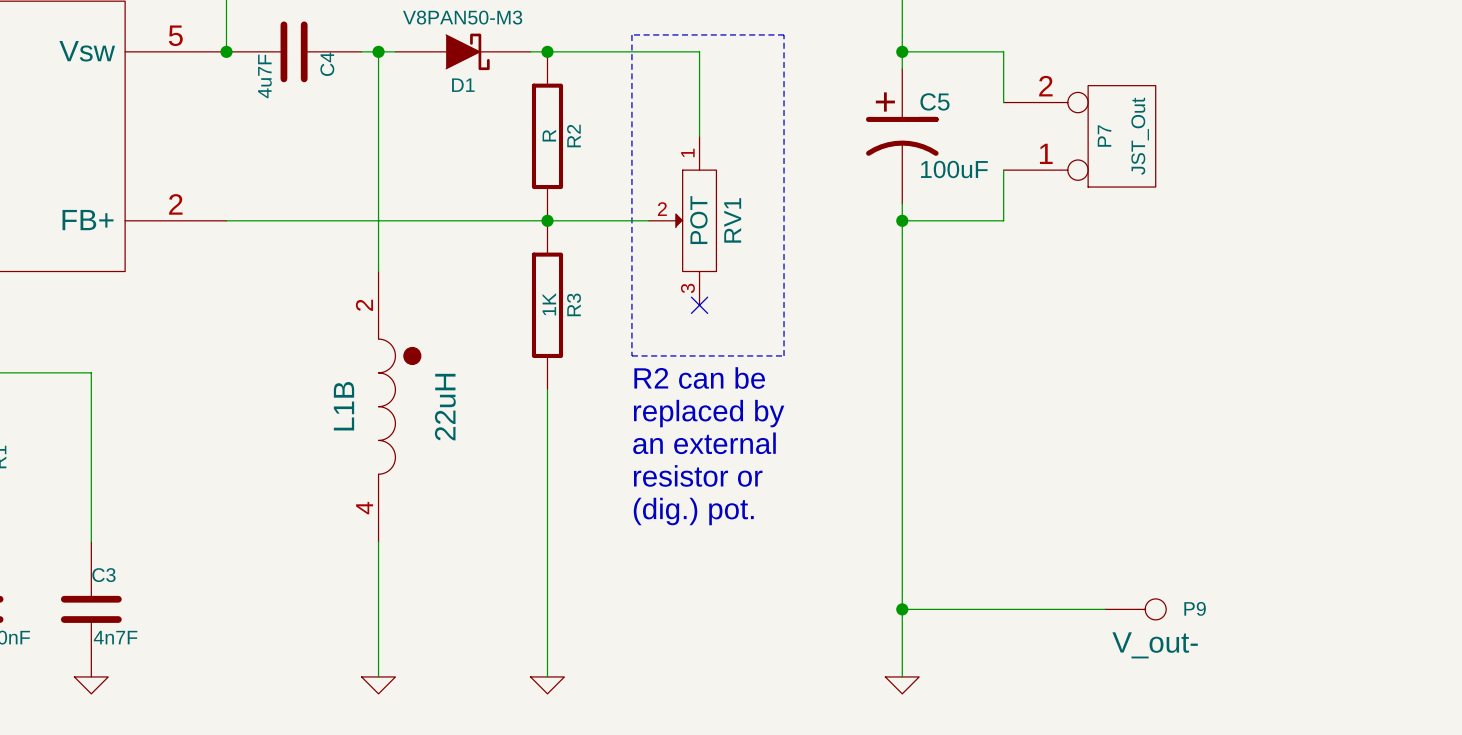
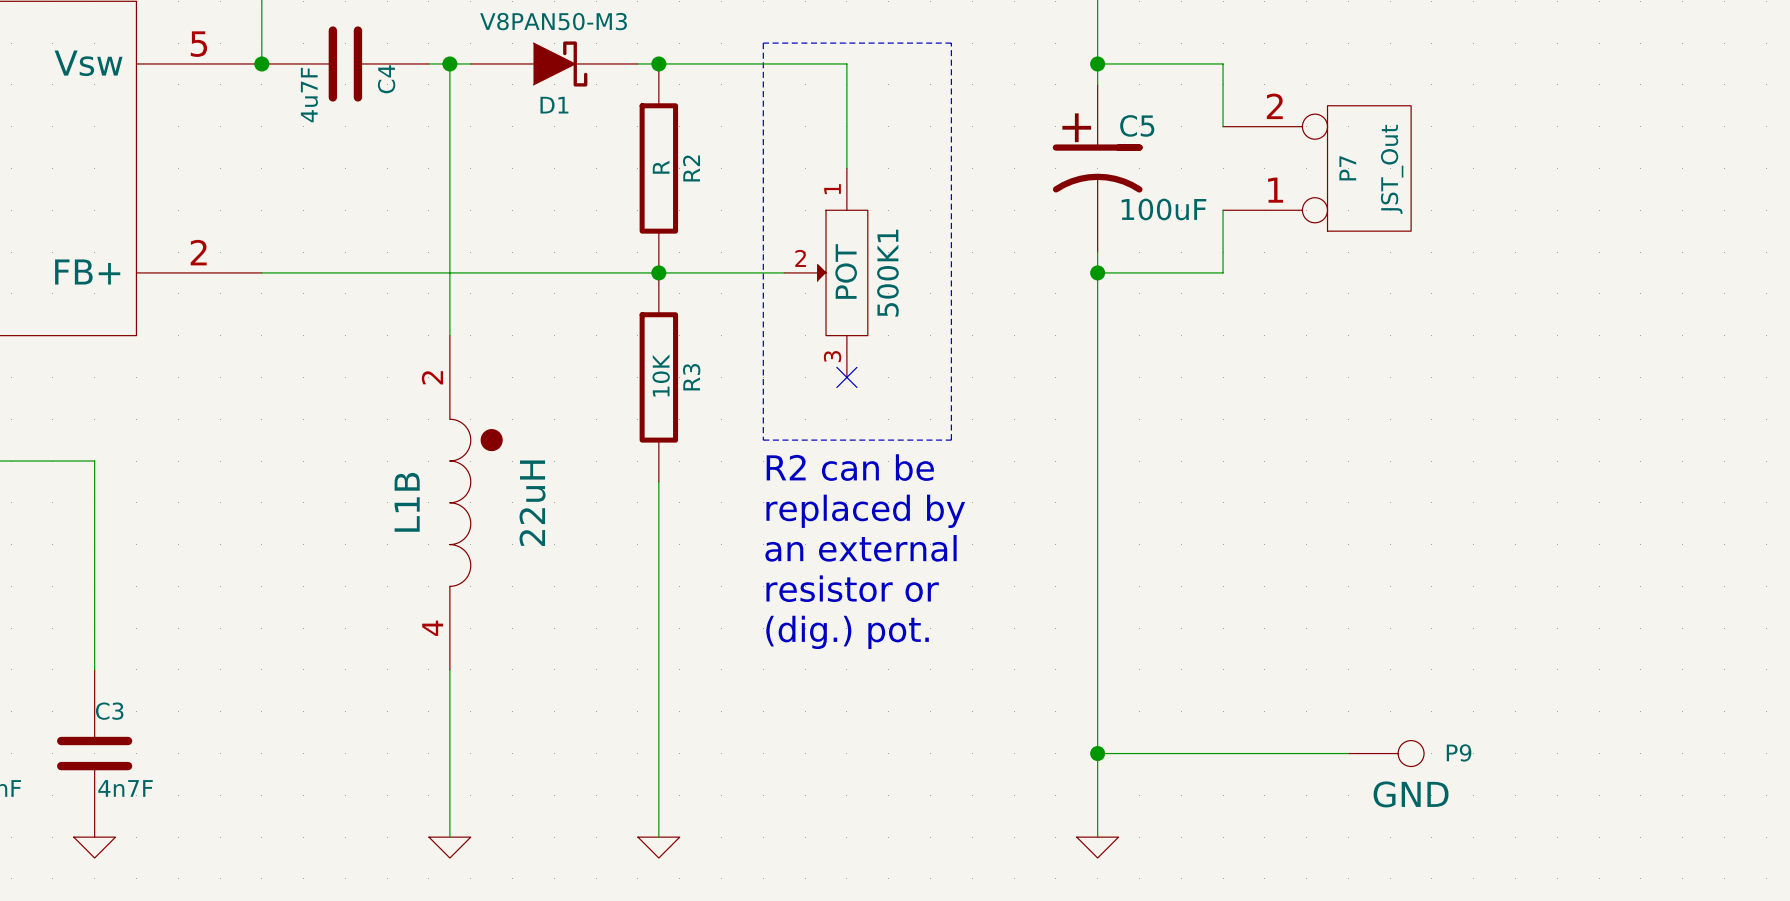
RV1 name: RV1 (732, 220) -> 500K1 (887, 273)
R3 value: 1K (549, 304) -> 10K (661, 375)
P9 value: V_out- (1155, 645) -> GND (1411, 794)

